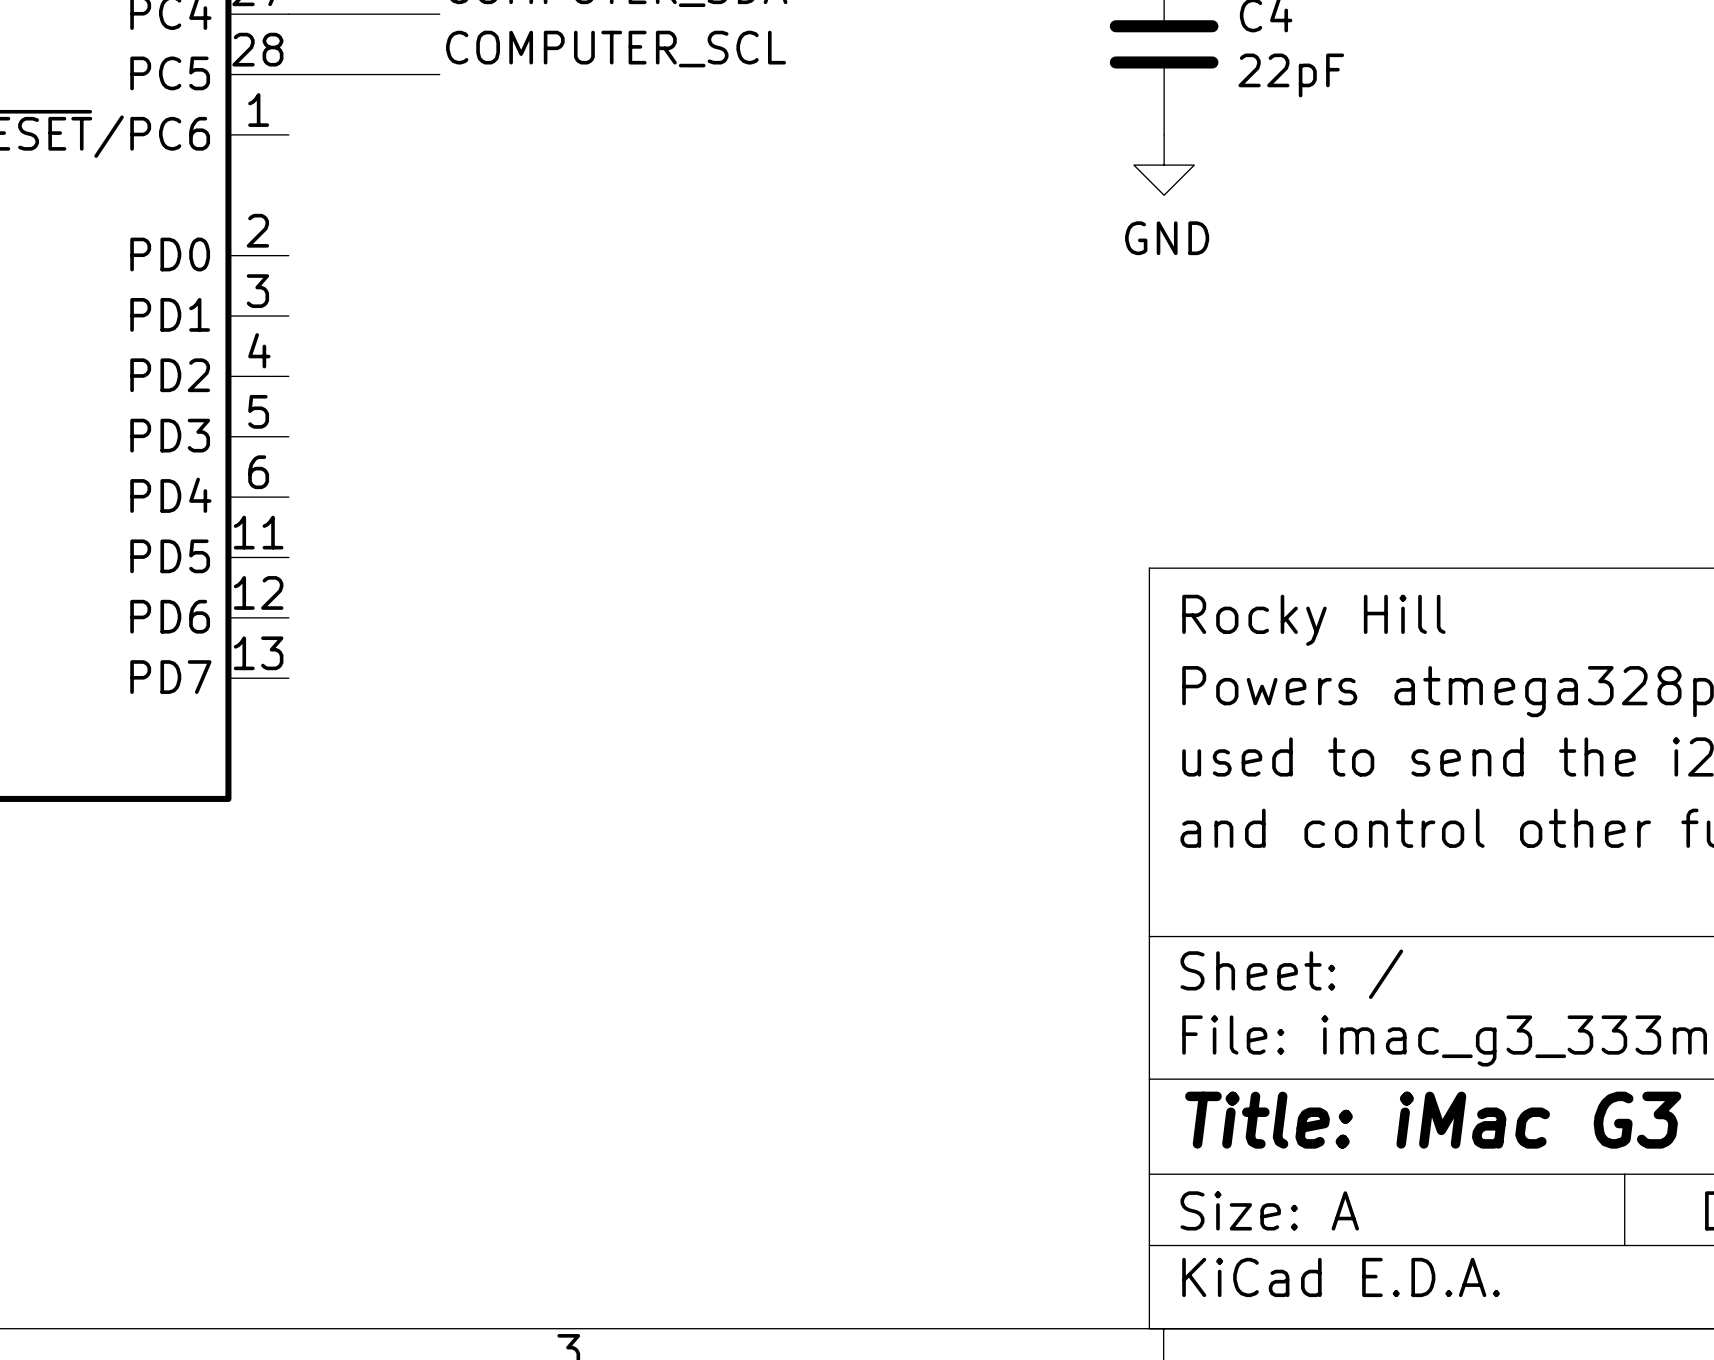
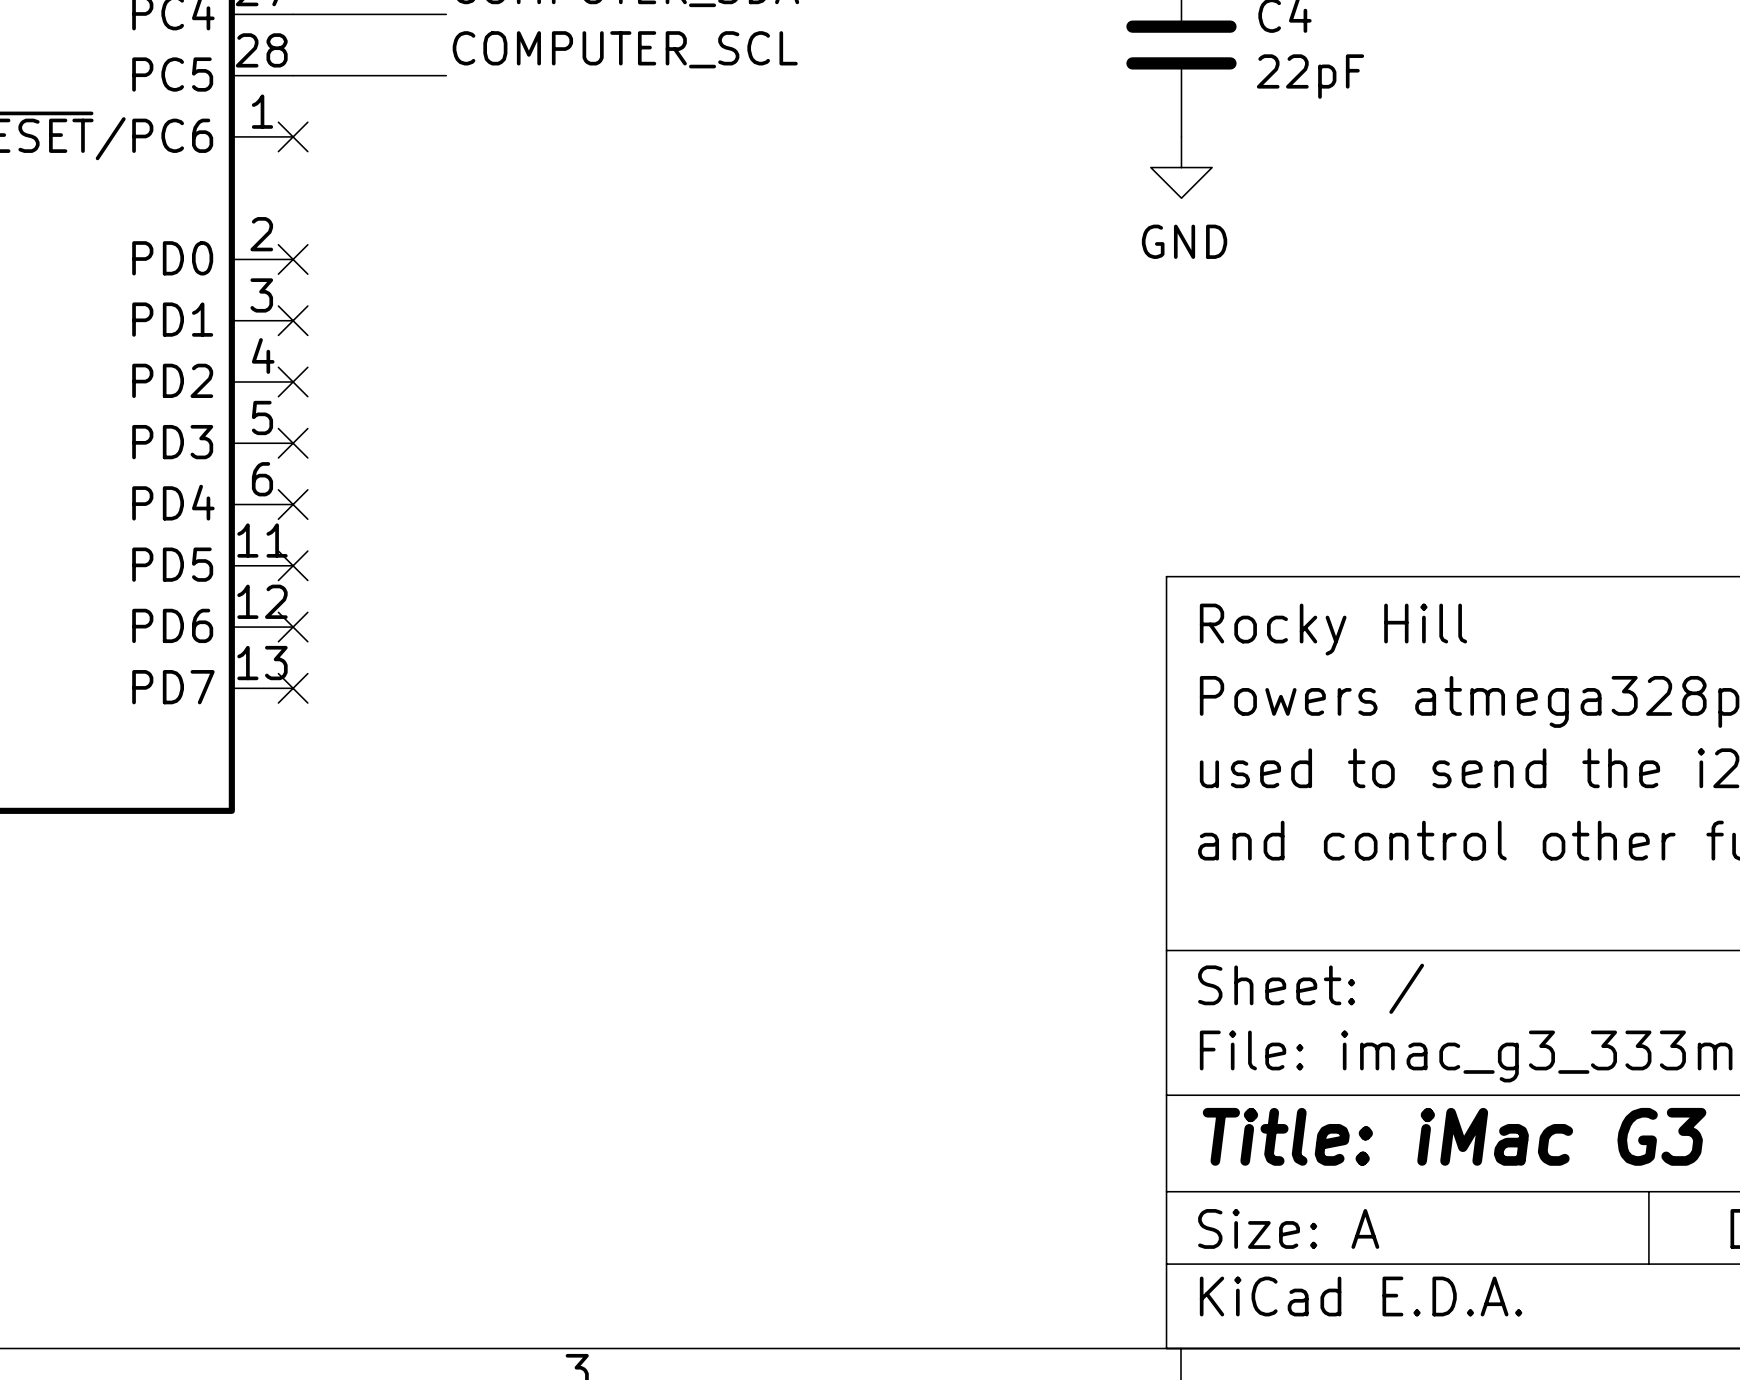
no-connect mark: none -> (293, 136)
no-connect mark: none -> (293, 259)
no-connect mark: none -> (293, 320)
no-connect mark: none -> (293, 381)
no-connect mark: none -> (293, 443)
no-connect mark: none -> (293, 504)
no-connect mark: none -> (293, 565)
no-connect mark: none -> (293, 627)
no-connect mark: none -> (293, 688)

